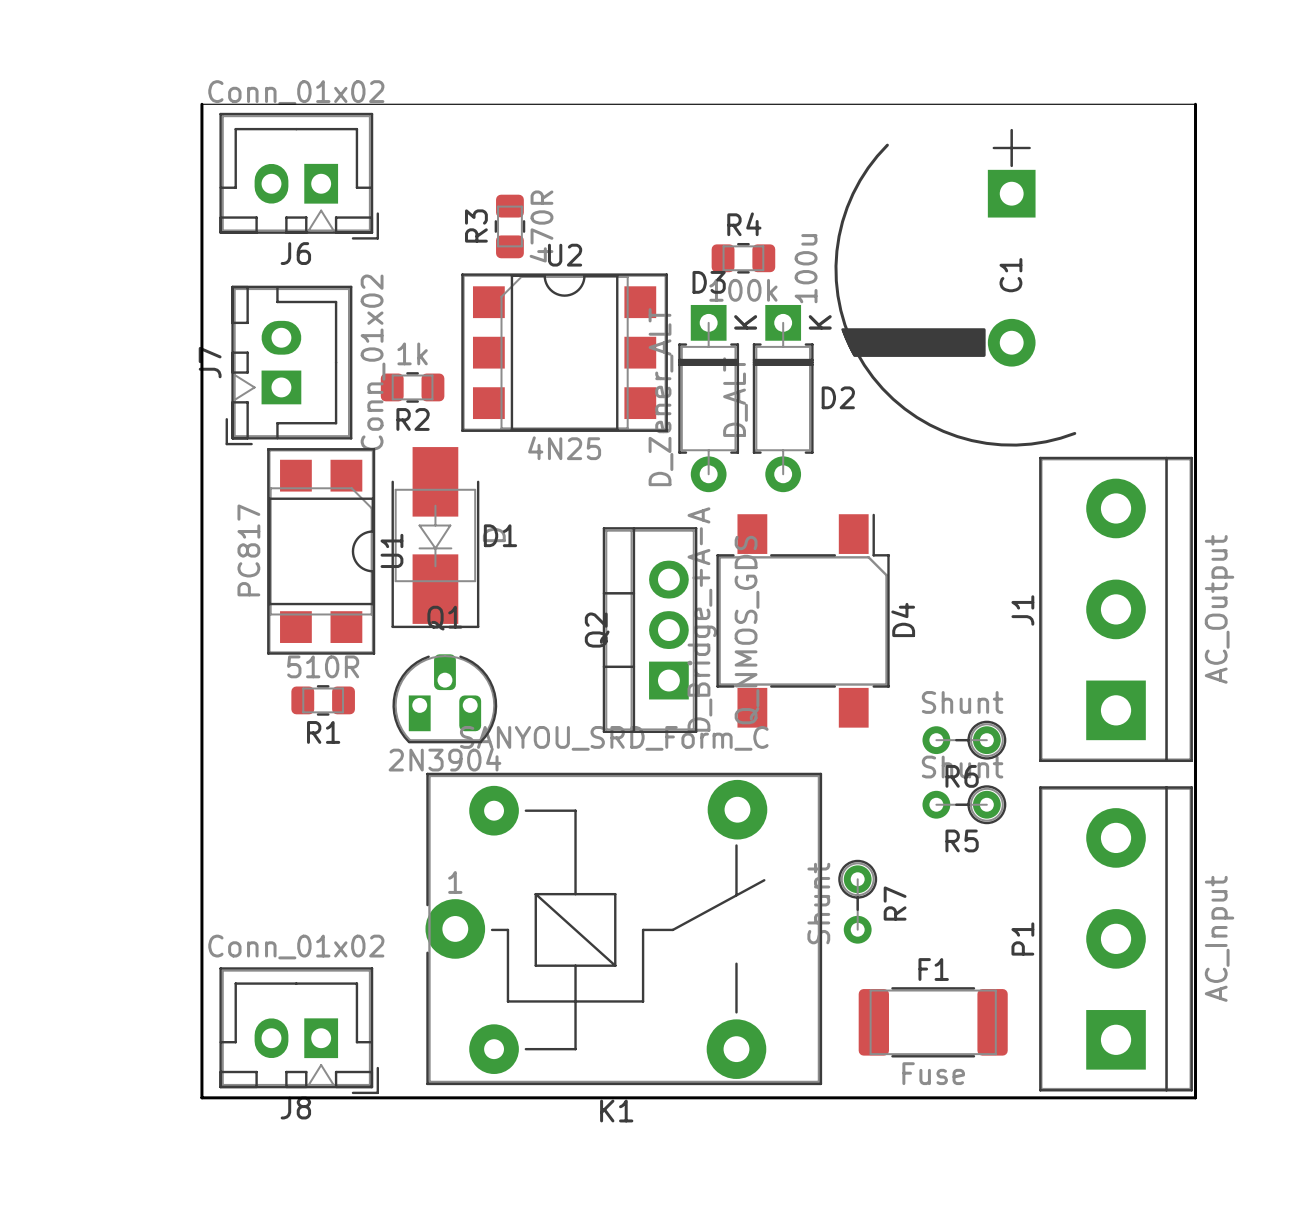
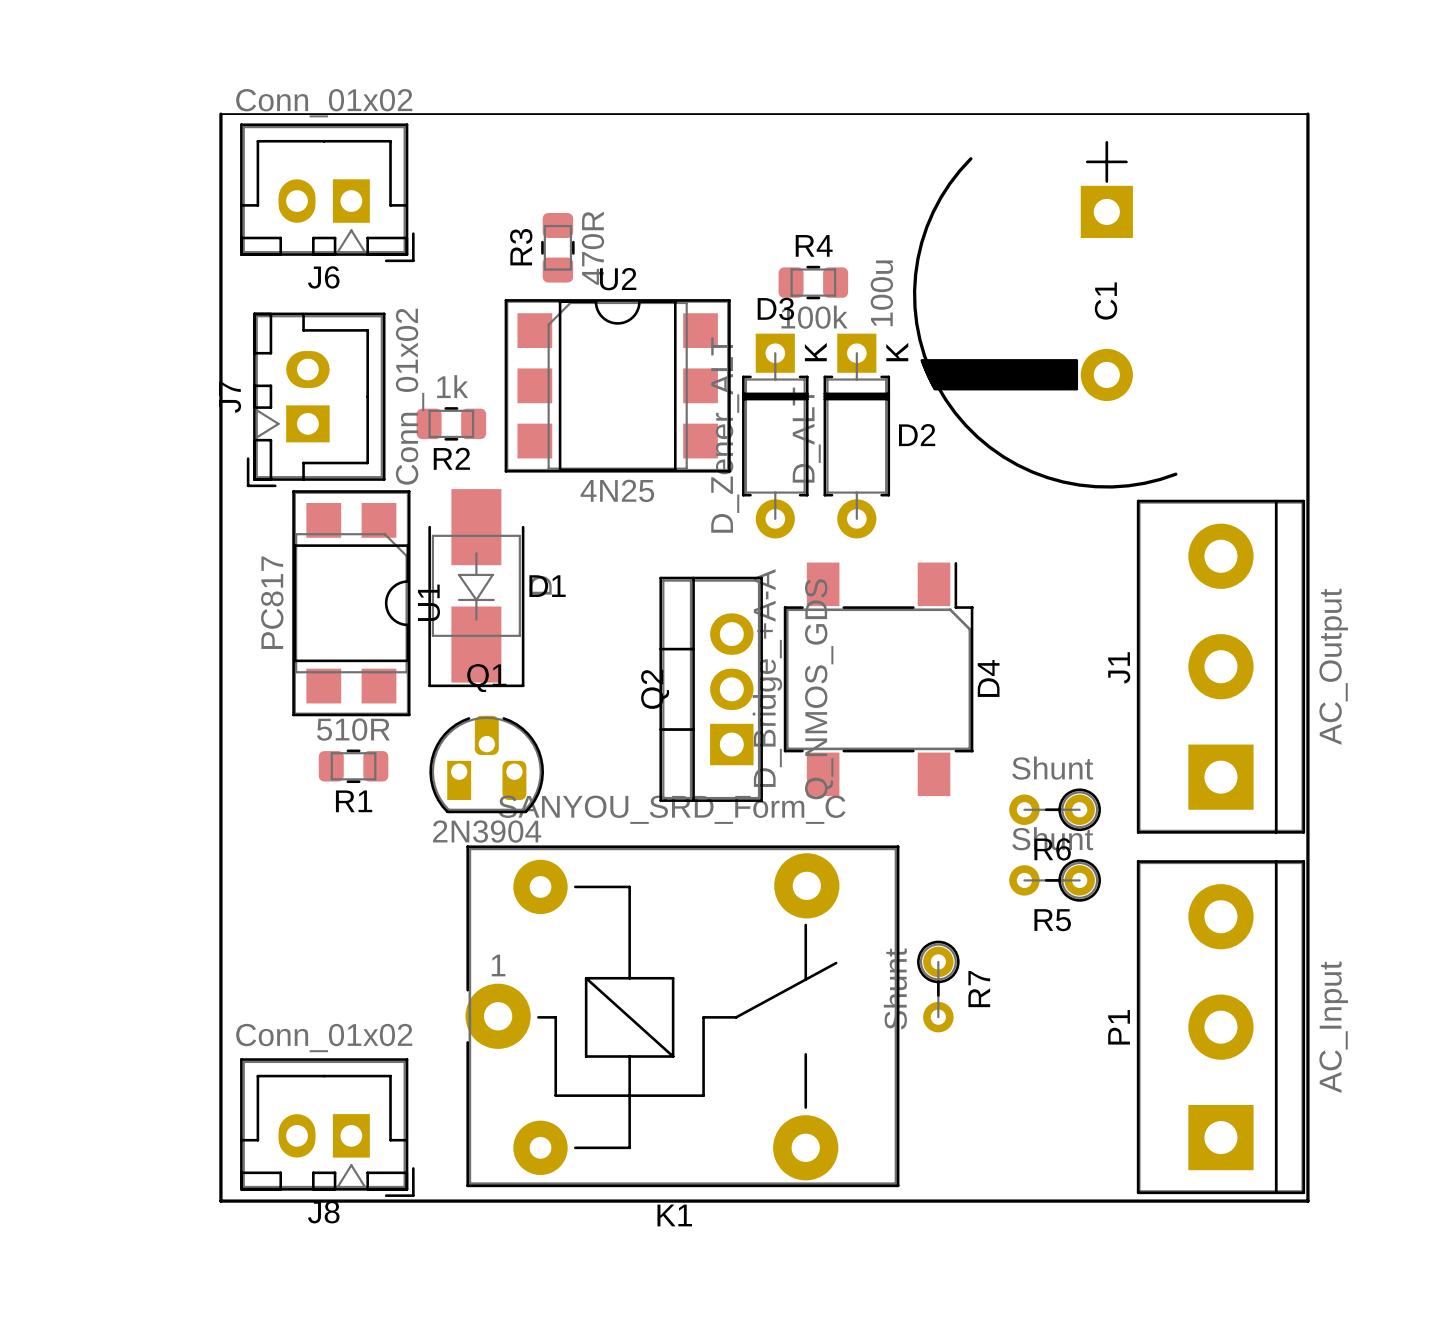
F1: Fuse (933, 1022) -> none

